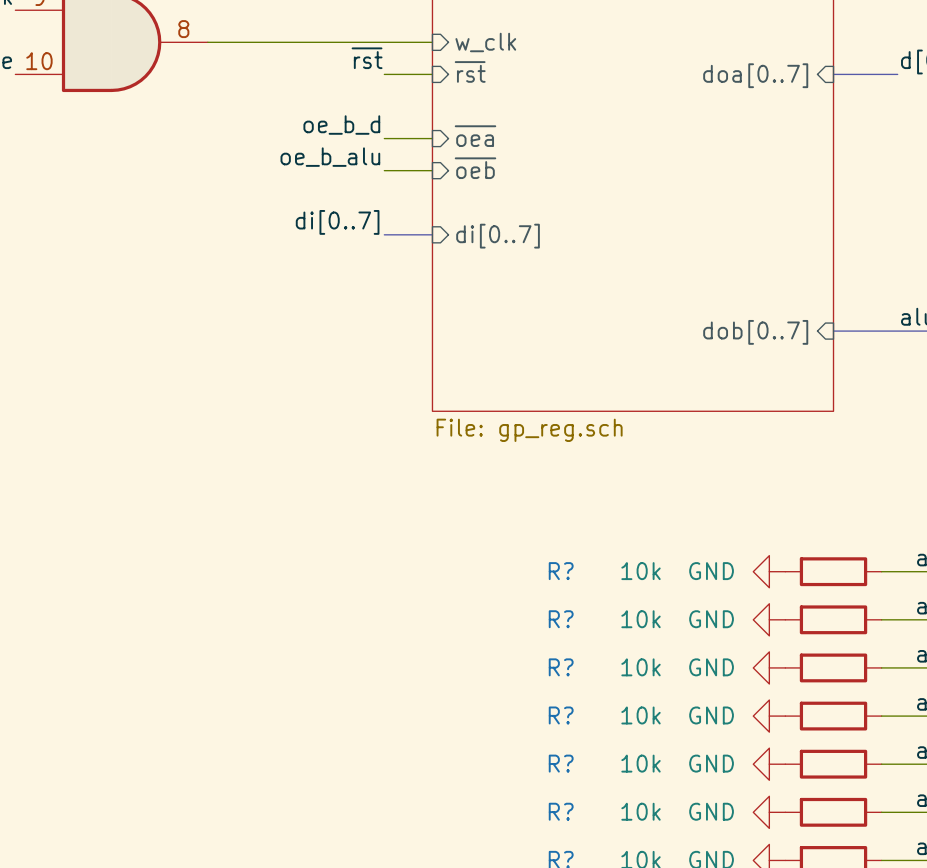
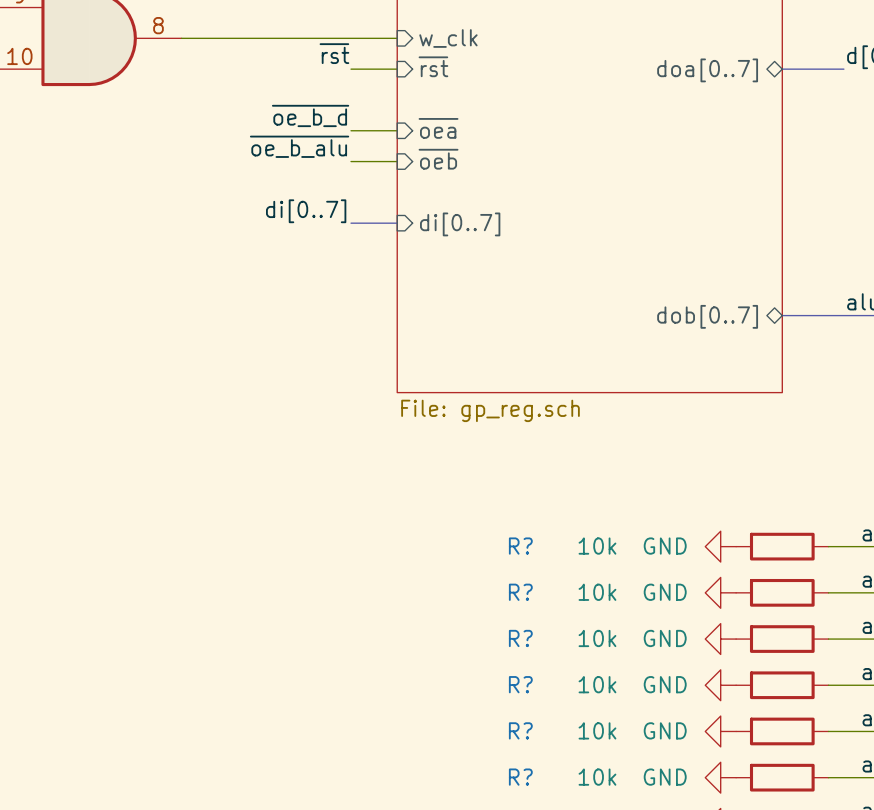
sheet pin shape: input (755, 75) -> bidirectional (707, 70)
label: oe_b_d (341, 125) -> ~{oe_b_d} (310, 115)
label: oe_b_alu (330, 157) -> ~{oe_b_alu} (299, 146)
sheet pin shape: input (755, 332) -> bidirectional (707, 316)

